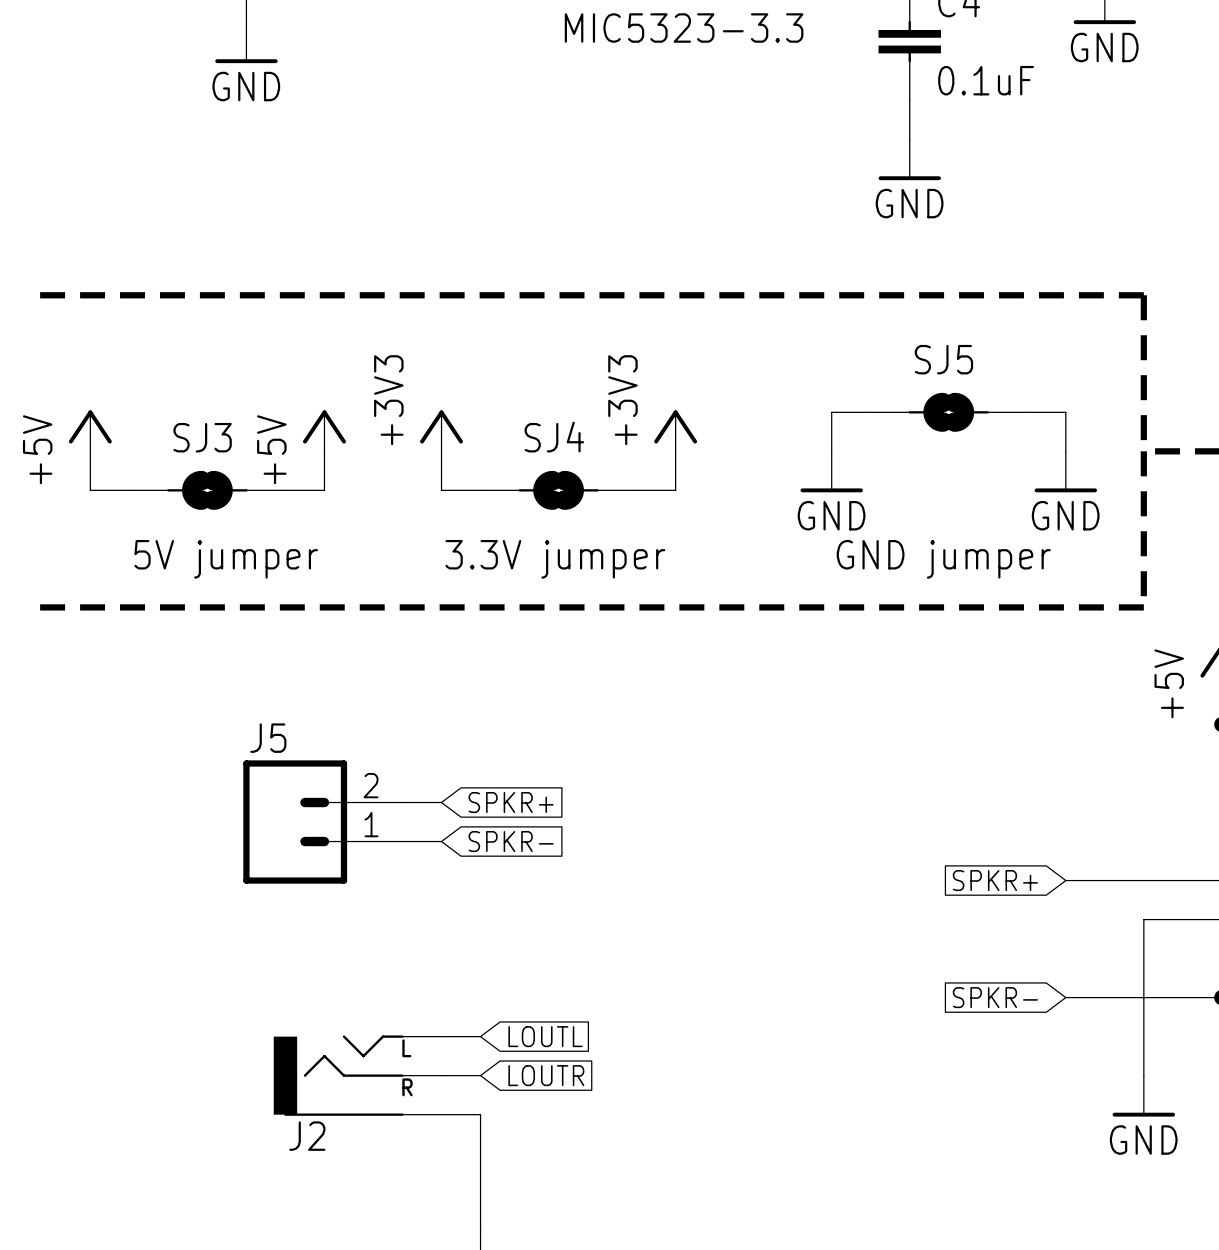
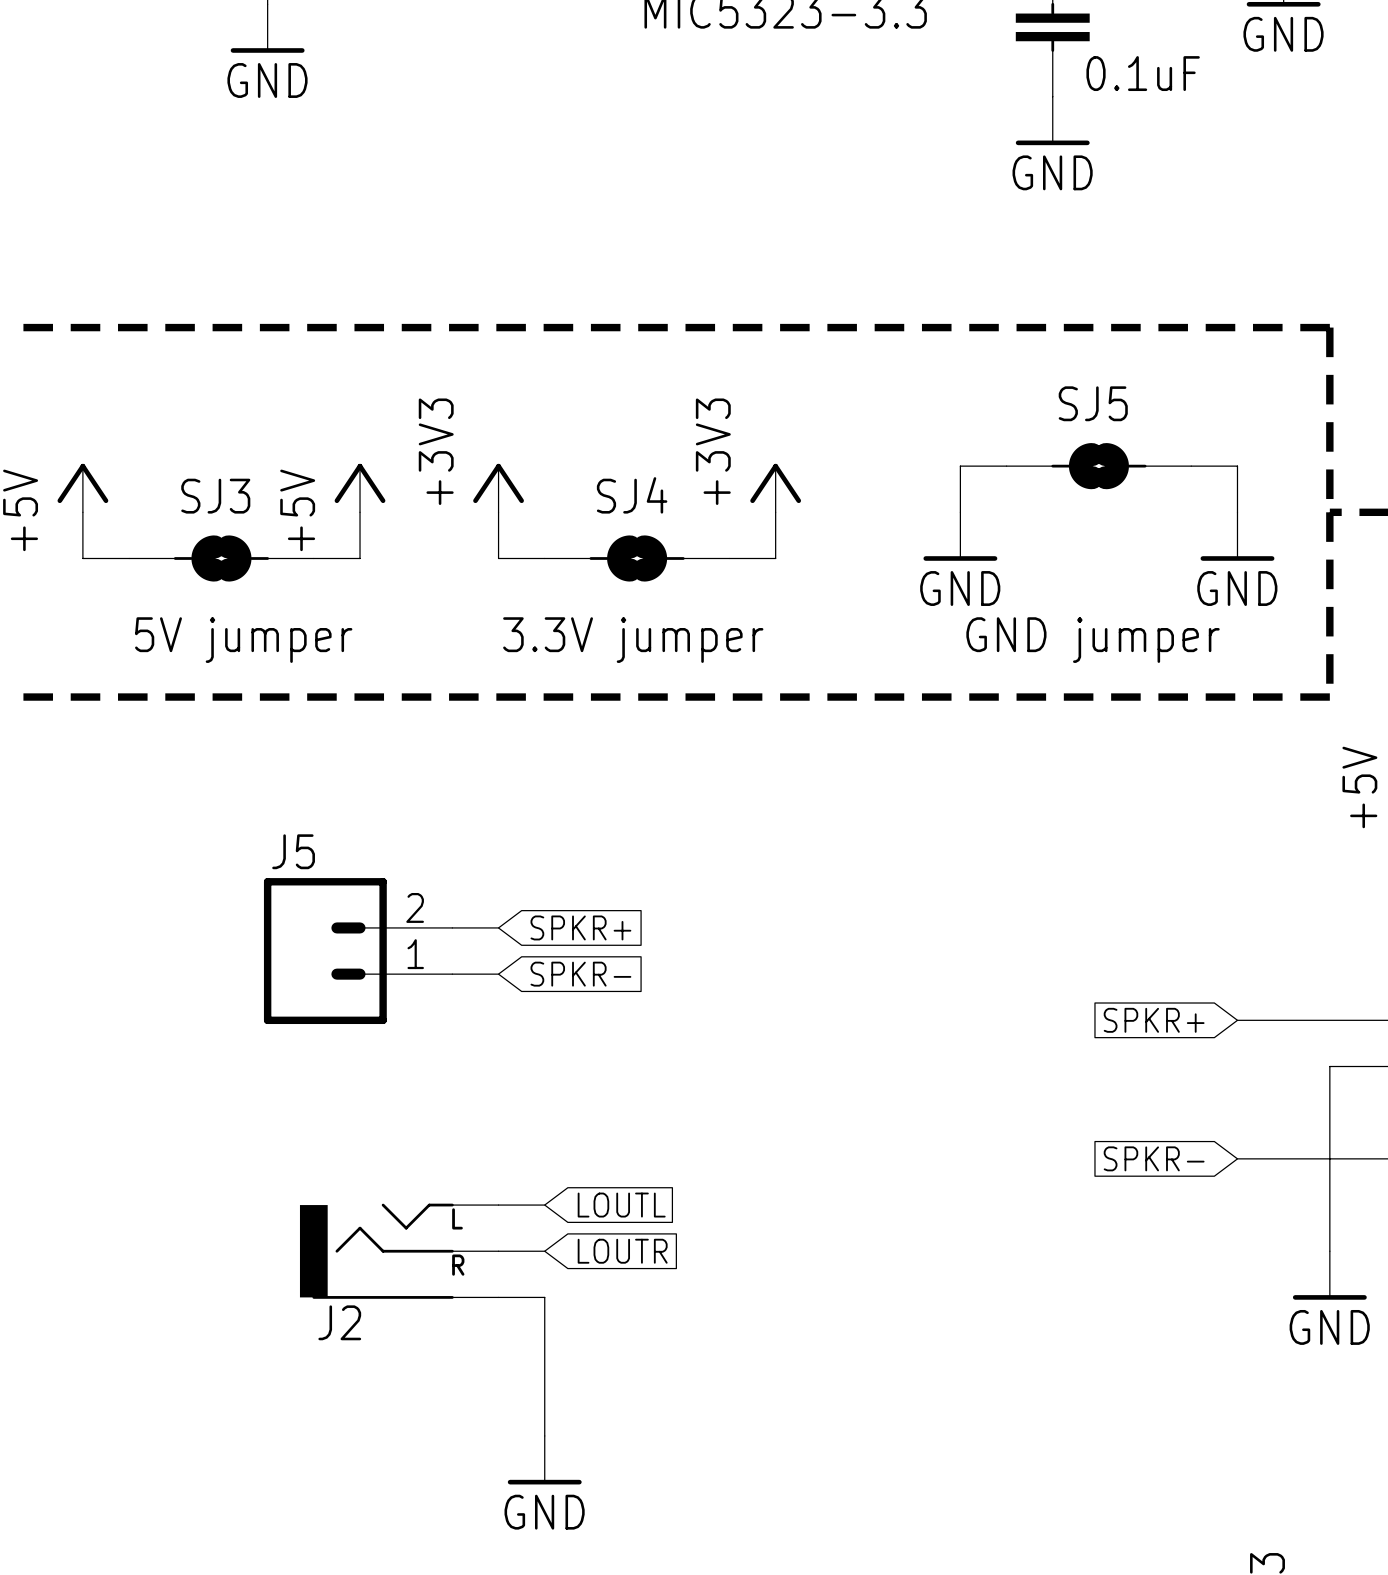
power symbol position: GND (909, 159) -> GND (1052, 120)

